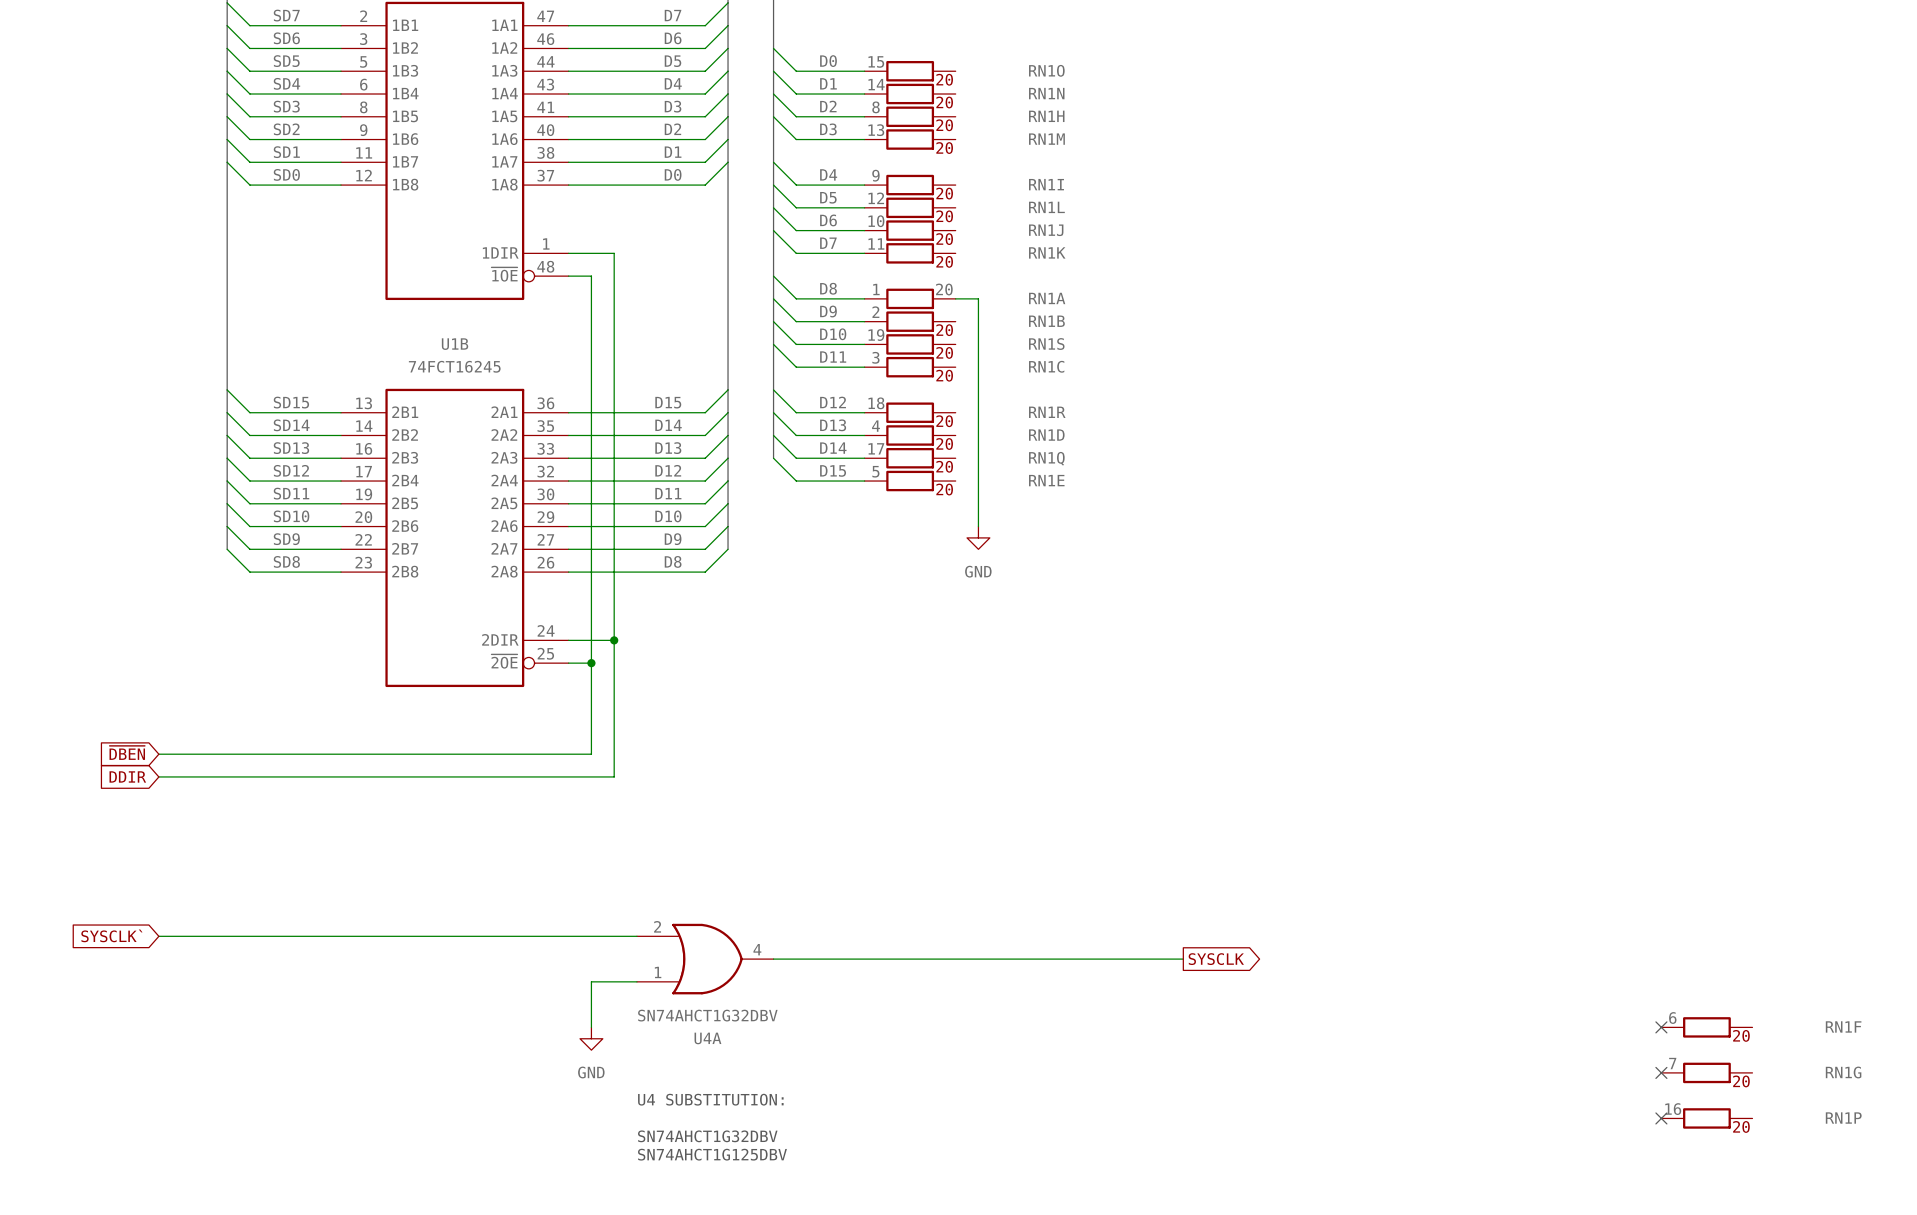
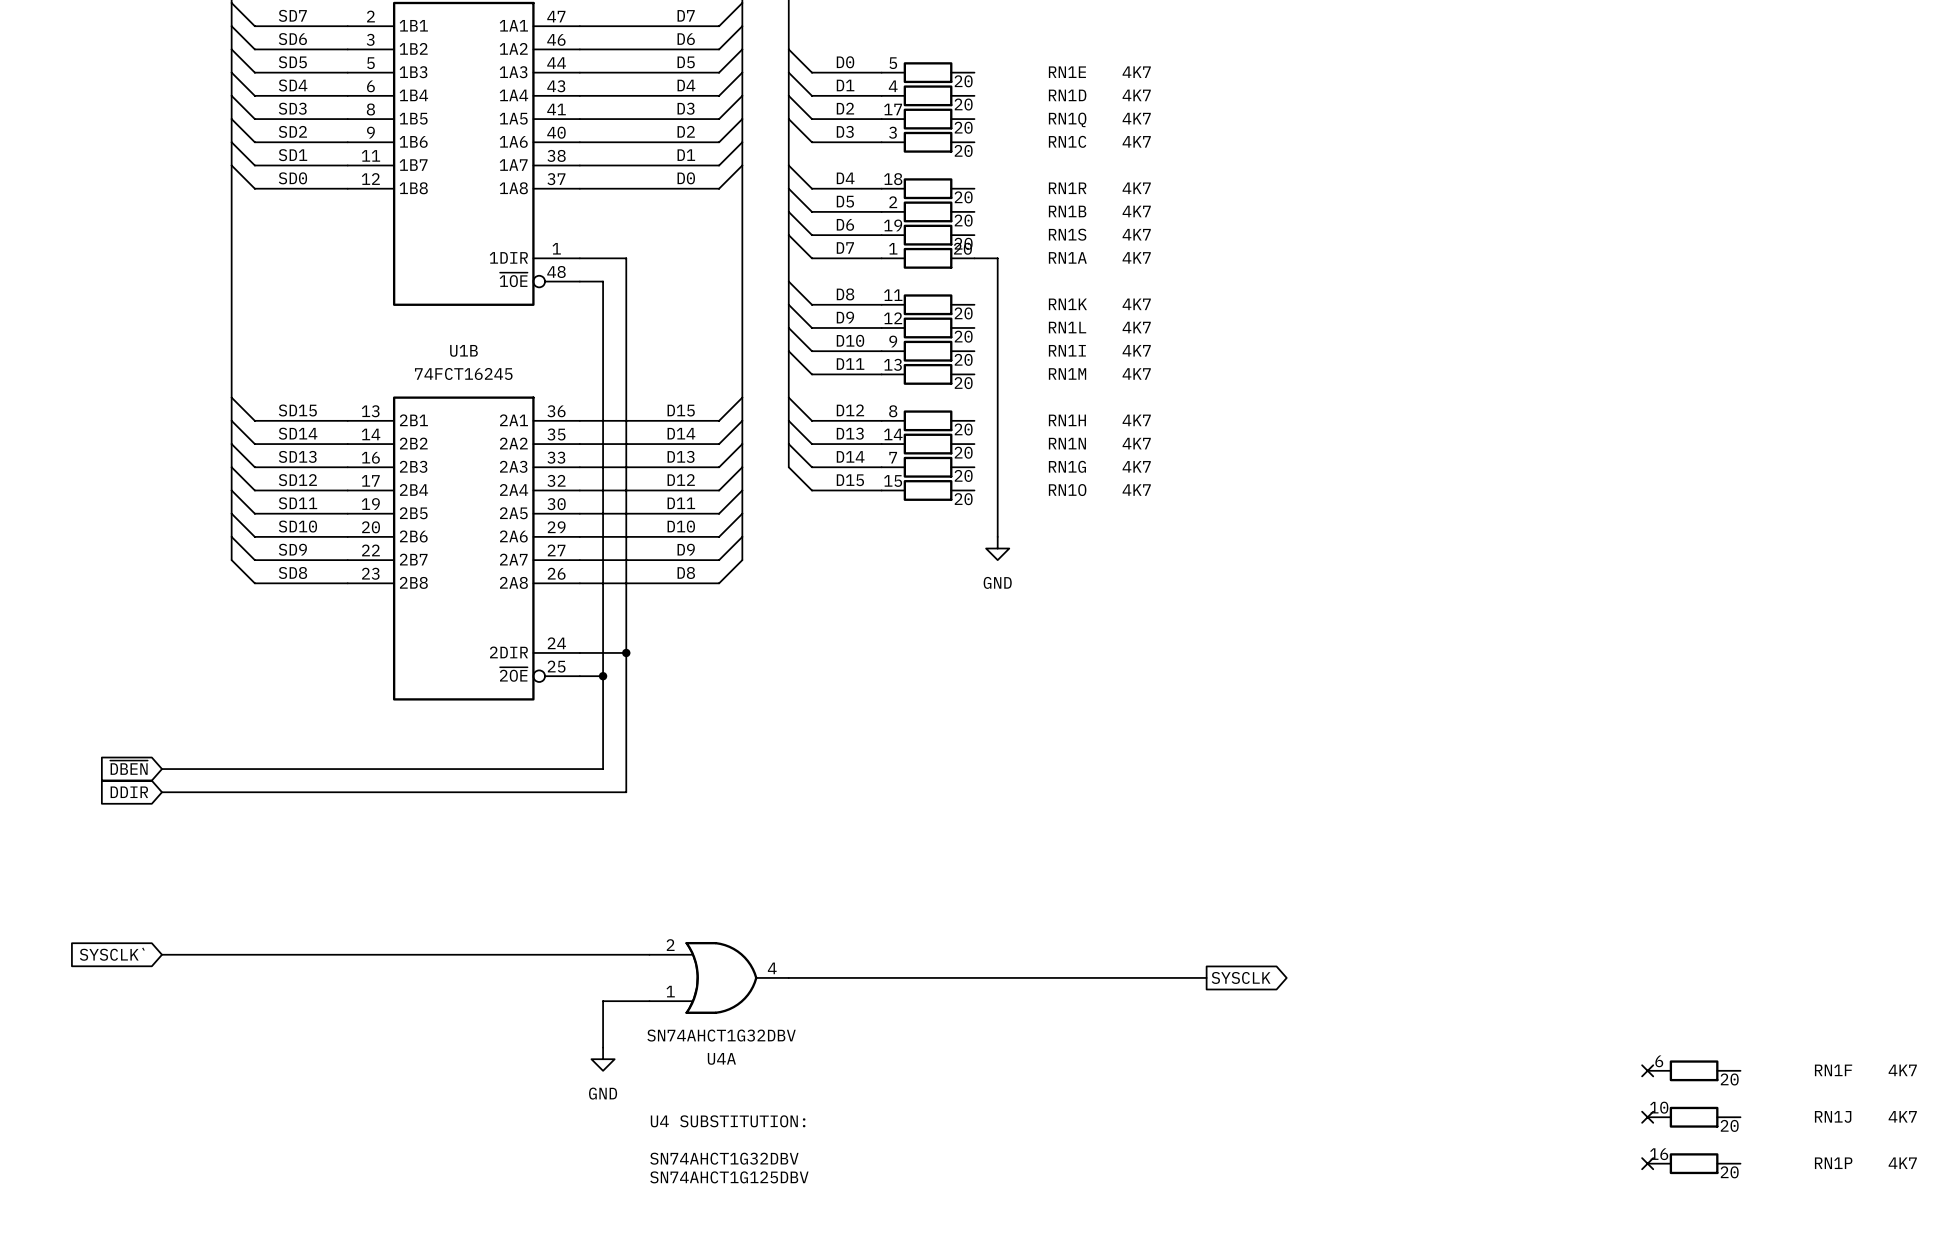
RN1E value: none -> 4K7 (1136, 72)
RN1O position: (910, 71) -> (928, 490)
RN1D value: none -> 4K7 (1136, 95)
RN1N position: (910, 94) -> (928, 444)
RN1H position: (910, 116) -> (928, 420)
RN1Q value: none -> 4K7 (1136, 118)
RN1M position: (910, 139) -> (928, 374)
RN1C value: none -> 4K7 (1136, 141)
RN1R value: none -> 4K7 (1136, 188)
RN1I position: (910, 185) -> (928, 351)
RN1L position: (910, 207) -> (928, 327)
RN1B value: none -> 4K7 (1136, 211)
RN1J position: (910, 230) -> (1694, 1117)
RN1S value: none -> 4K7 (1136, 234)
RN1A value: none -> 4K7 (1136, 257)
RN1K position: (910, 253) -> (928, 304)
RN1A position: (910, 298) -> (928, 258)
wire: (955, 298) (978, 298) -> (974, 258) (997, 258) (997, 304)
RN1K value: none -> 4K7 (1136, 304)
RN1B position: (910, 321) -> (928, 211)
RN1L value: none -> 4K7 (1136, 327)
RN1I value: none -> 4K7 (1136, 350)
RN1S position: (910, 344) -> (928, 235)
RN1M value: none -> 4K7 (1136, 373)
RN1C position: (910, 367) -> (928, 142)
RN1R position: (910, 412) -> (928, 188)
RN1H value: none -> 4K7 (1136, 420)
RN1D position: (910, 435) -> (928, 95)
RN1N value: none -> 4K7 (1136, 443)
RN1G value: none -> 4K7 (1136, 466)
RN1Q position: (910, 458) -> (928, 119)
RN1O value: none -> 4K7 (1136, 490)
RN1E position: (910, 481) -> (928, 72)
no-connect mark: (1661, 1027) -> none
RN1F position: (1706, 1027) -> (1694, 1070)
RN1F value: none -> 4K7 (1902, 1070)
no-connect mark: none -> (1647, 1070)
no-connect mark: (1661, 1072) -> none
RN1G position: (1706, 1072) -> (928, 467)
no-connect mark: none -> (1647, 1117)
RN1J value: none -> 4K7 (1902, 1116)
no-connect mark: (1661, 1118) -> none
RN1P position: (1706, 1118) -> (1694, 1163)
RN1P value: none -> 4K7 (1902, 1163)
no-connect mark: none -> (1647, 1163)

